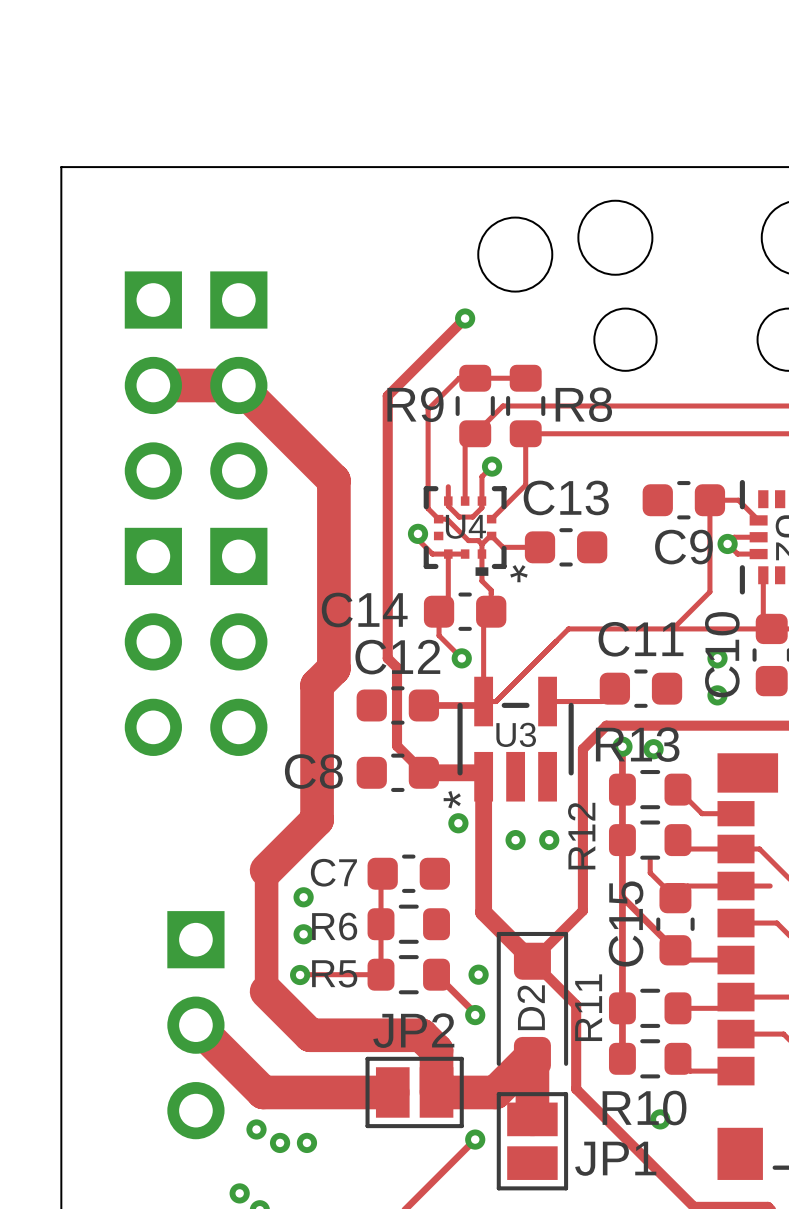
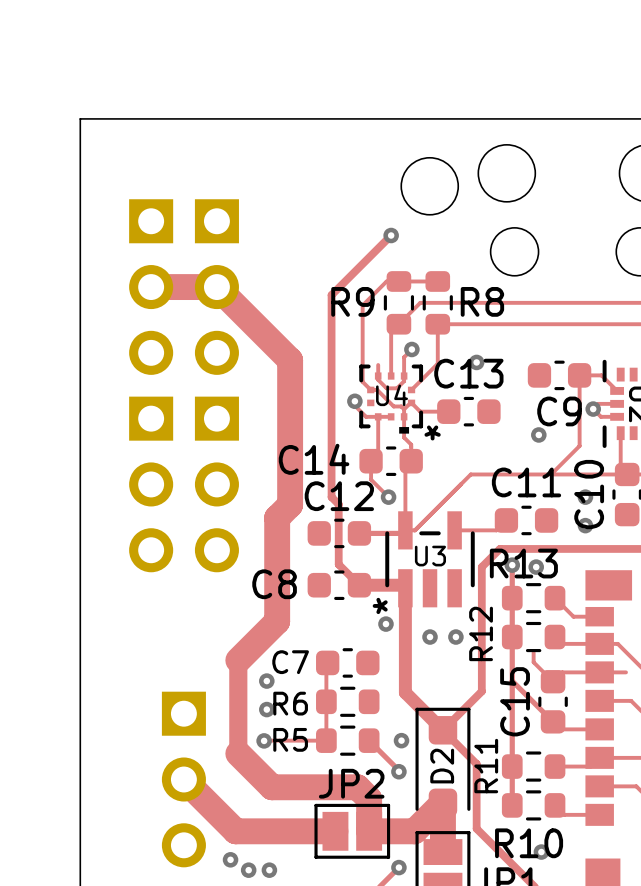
via: none -> (476, 362)
via: none -> (538, 434)

